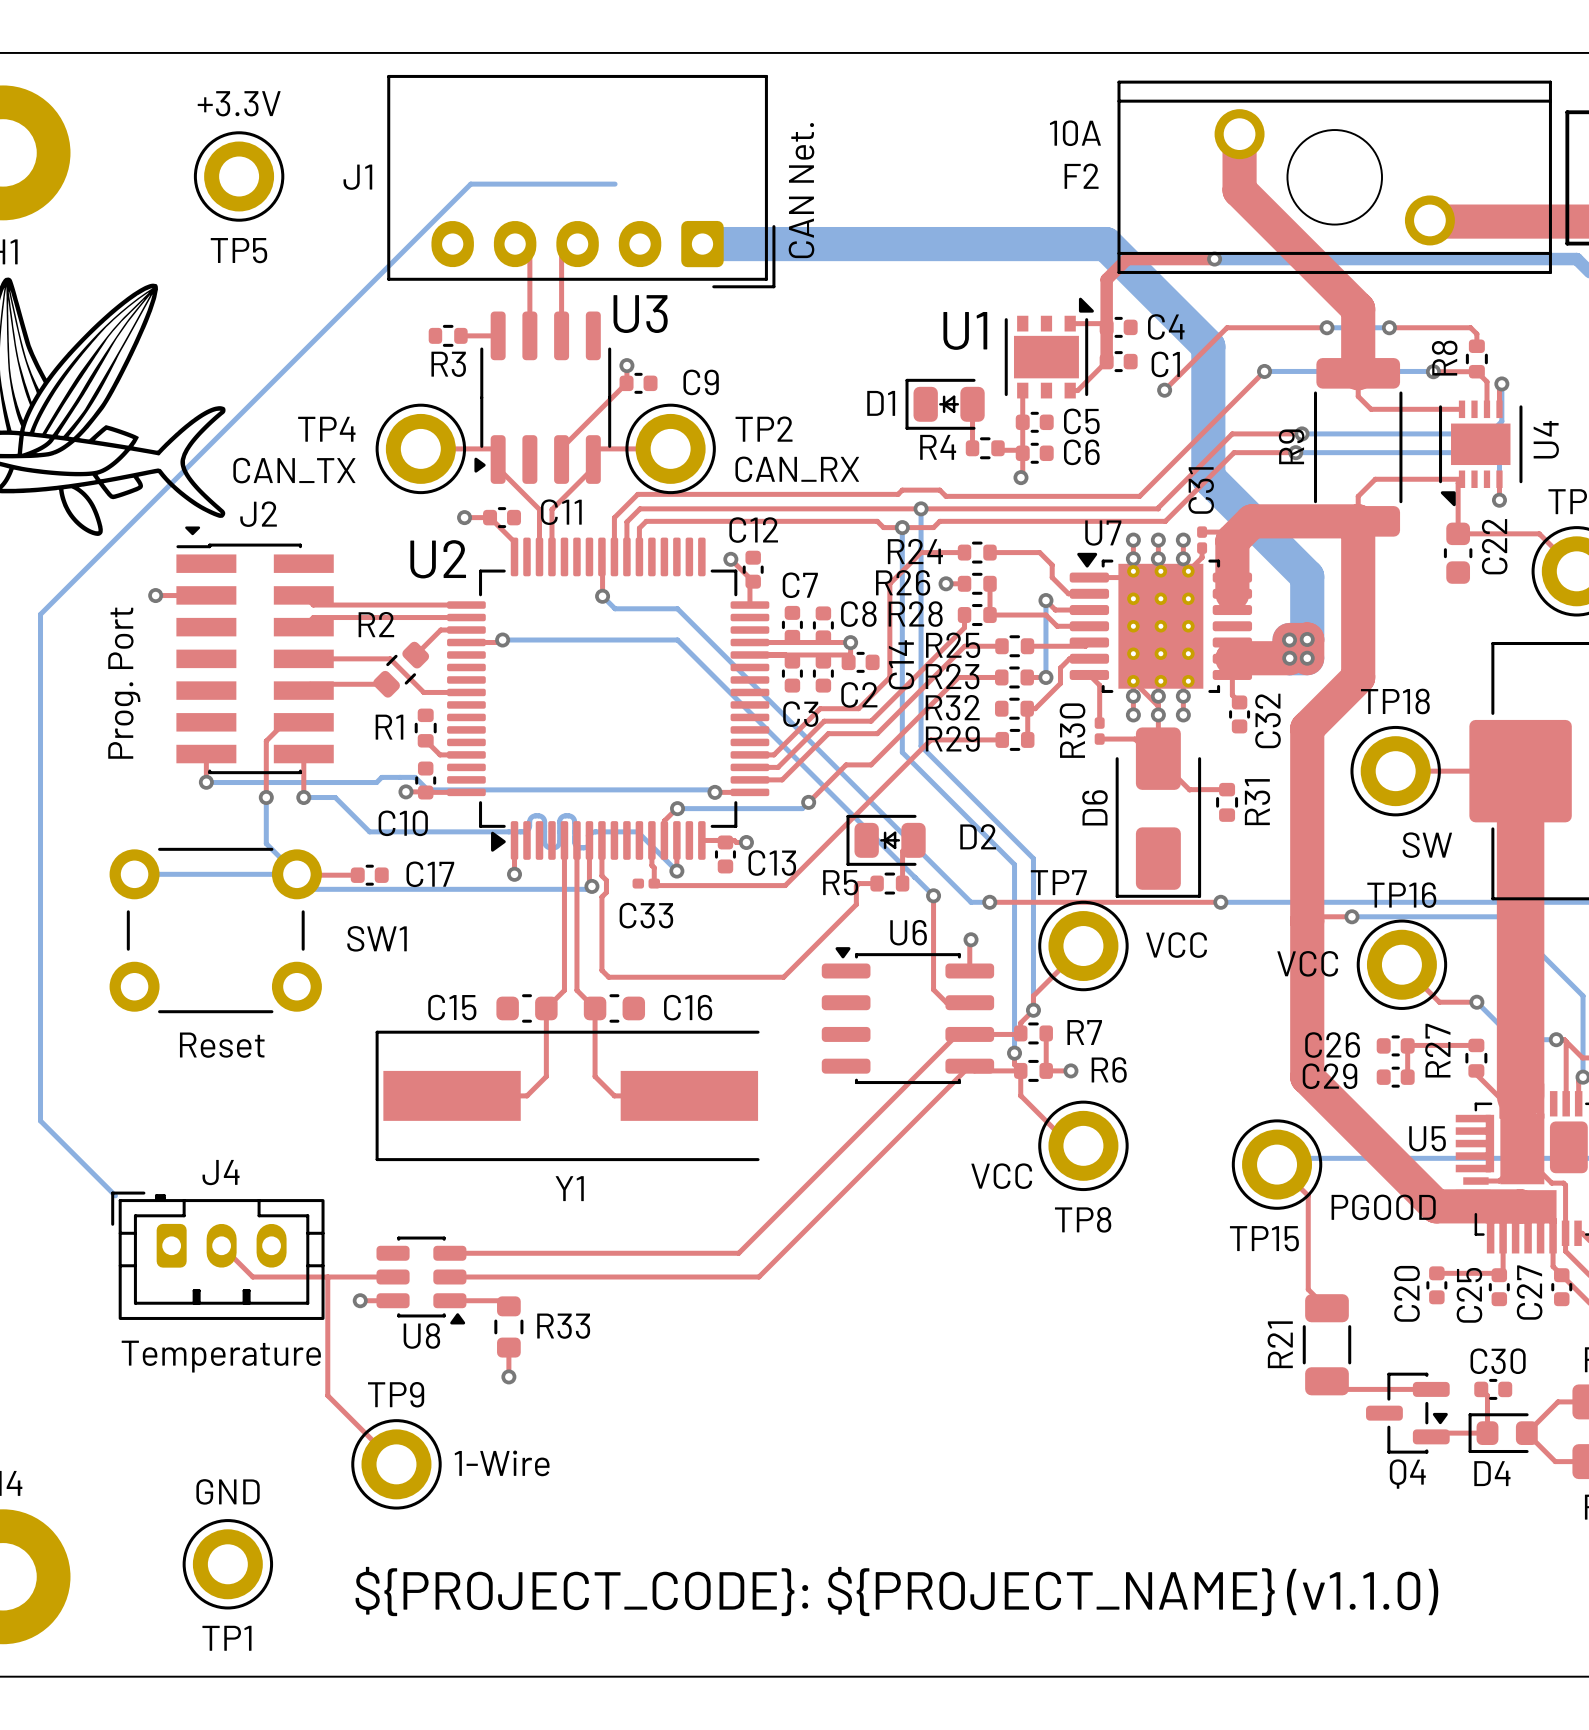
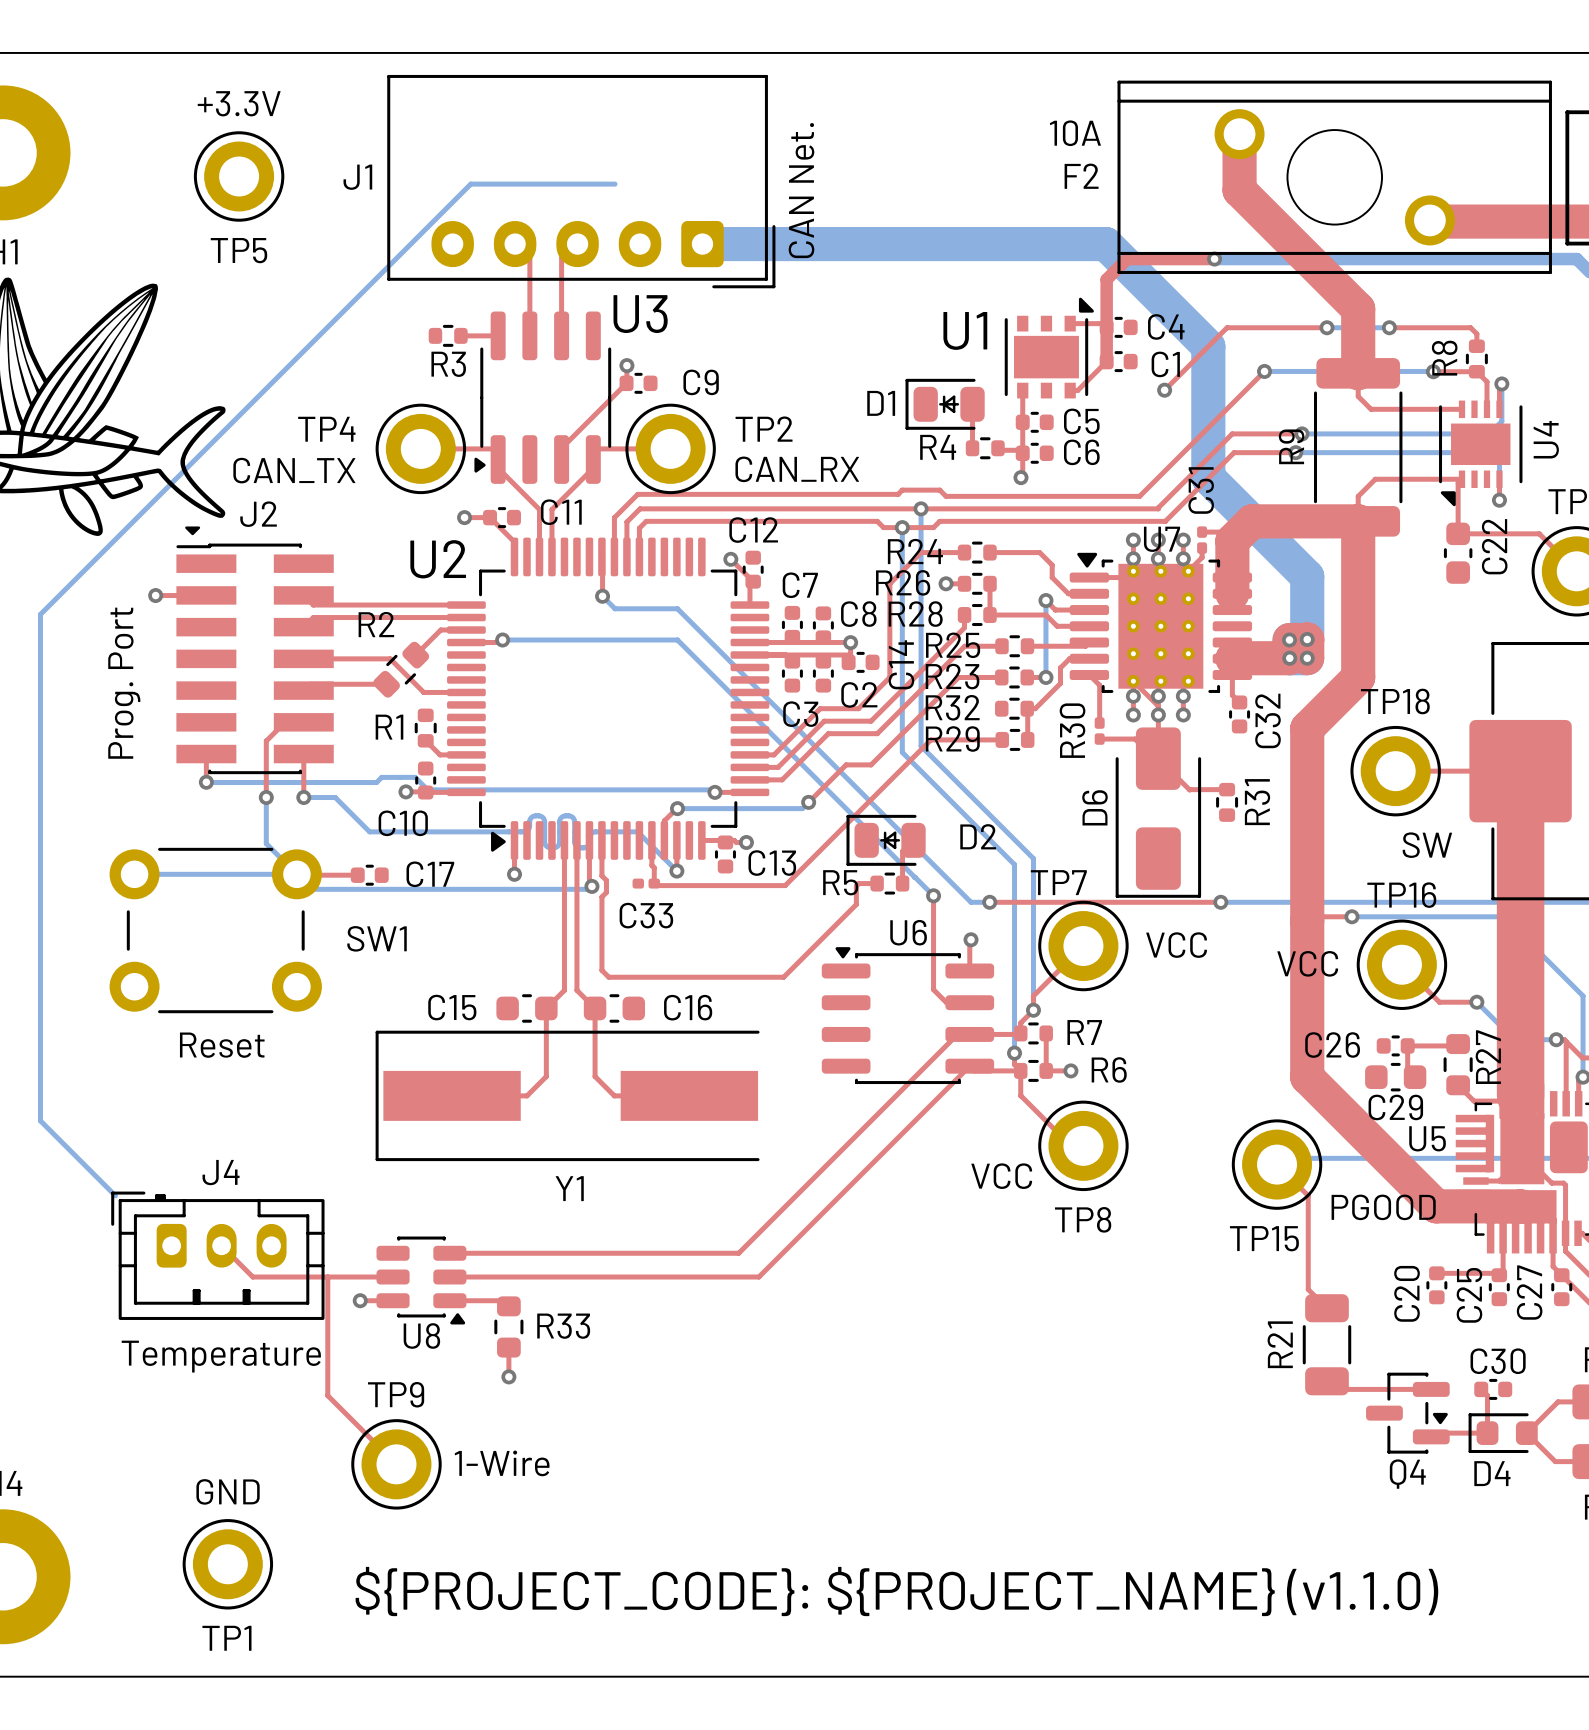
U7 name position: U7 (1103, 533) -> U7 (1162, 539)
R27 footprint: [1465, 1038, 1488, 1078] -> [1443, 1034, 1473, 1096]
top track: (1408, 1045) (1476, 1045) -> (1407, 1045) (1456, 1045) (1458, 1044)
R27 name position: R27 (1437, 1050) -> R27 (1488, 1057)
C29 footprint: [1376, 1066, 1415, 1088] -> [1365, 1062, 1427, 1092]
top track: (1476, 1070) (1476, 1074) (1503, 1101) -> (1458, 1085) (1473, 1101) (1503, 1101)
C29 name position: C29 (1329, 1076) -> C29 (1395, 1107)

